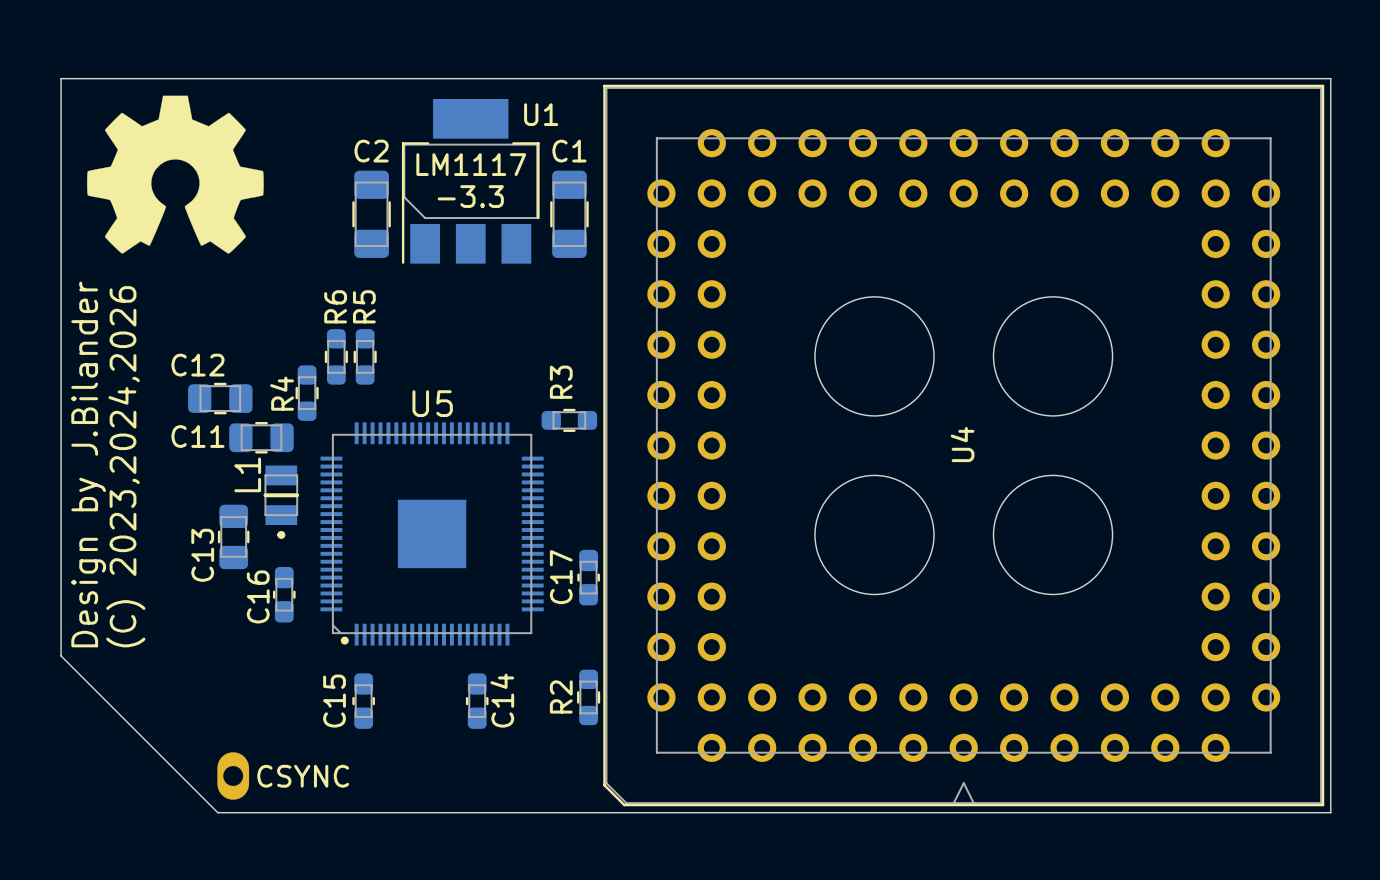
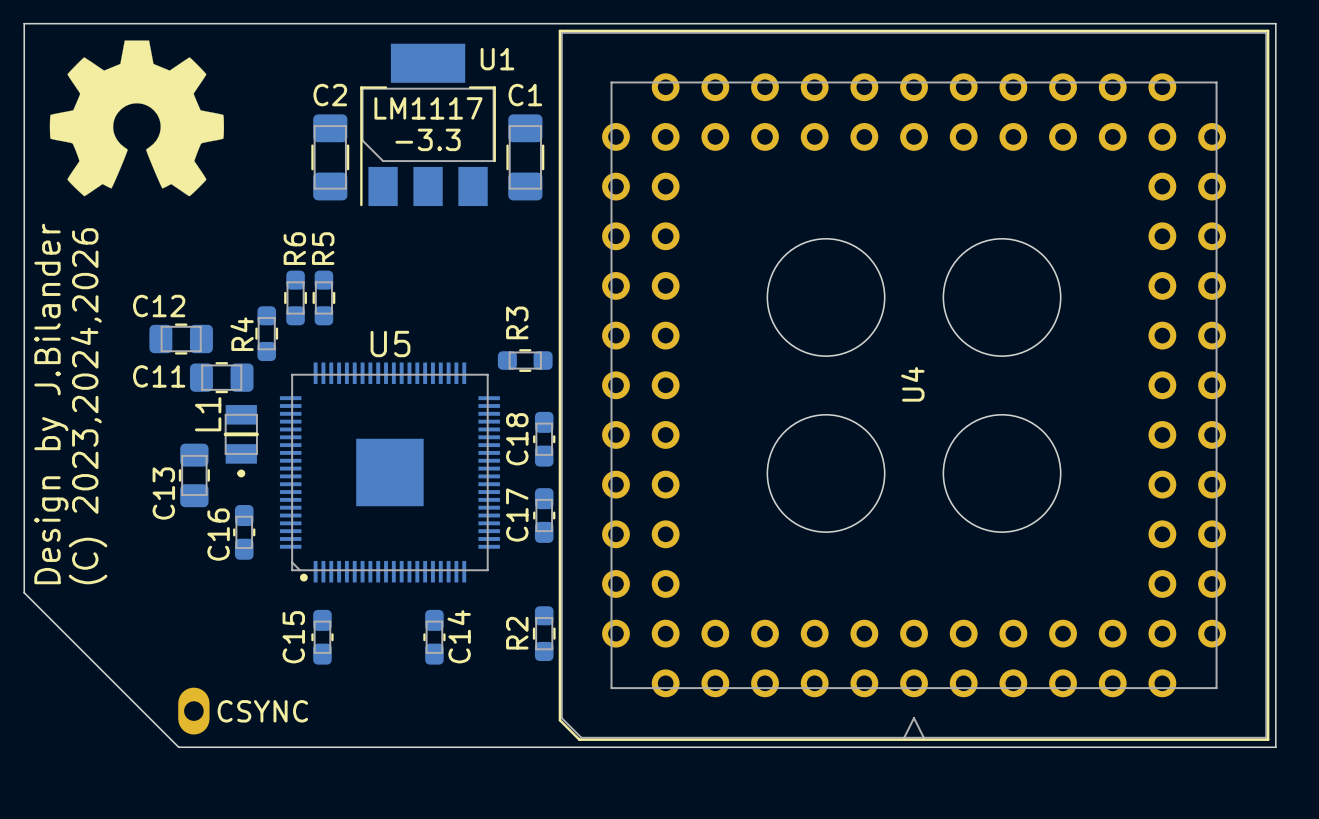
C18: none -> (544, 439)

